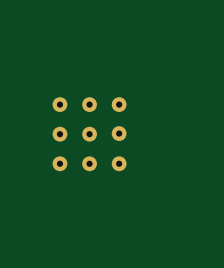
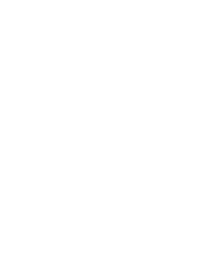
part: (89, 134) -> none

